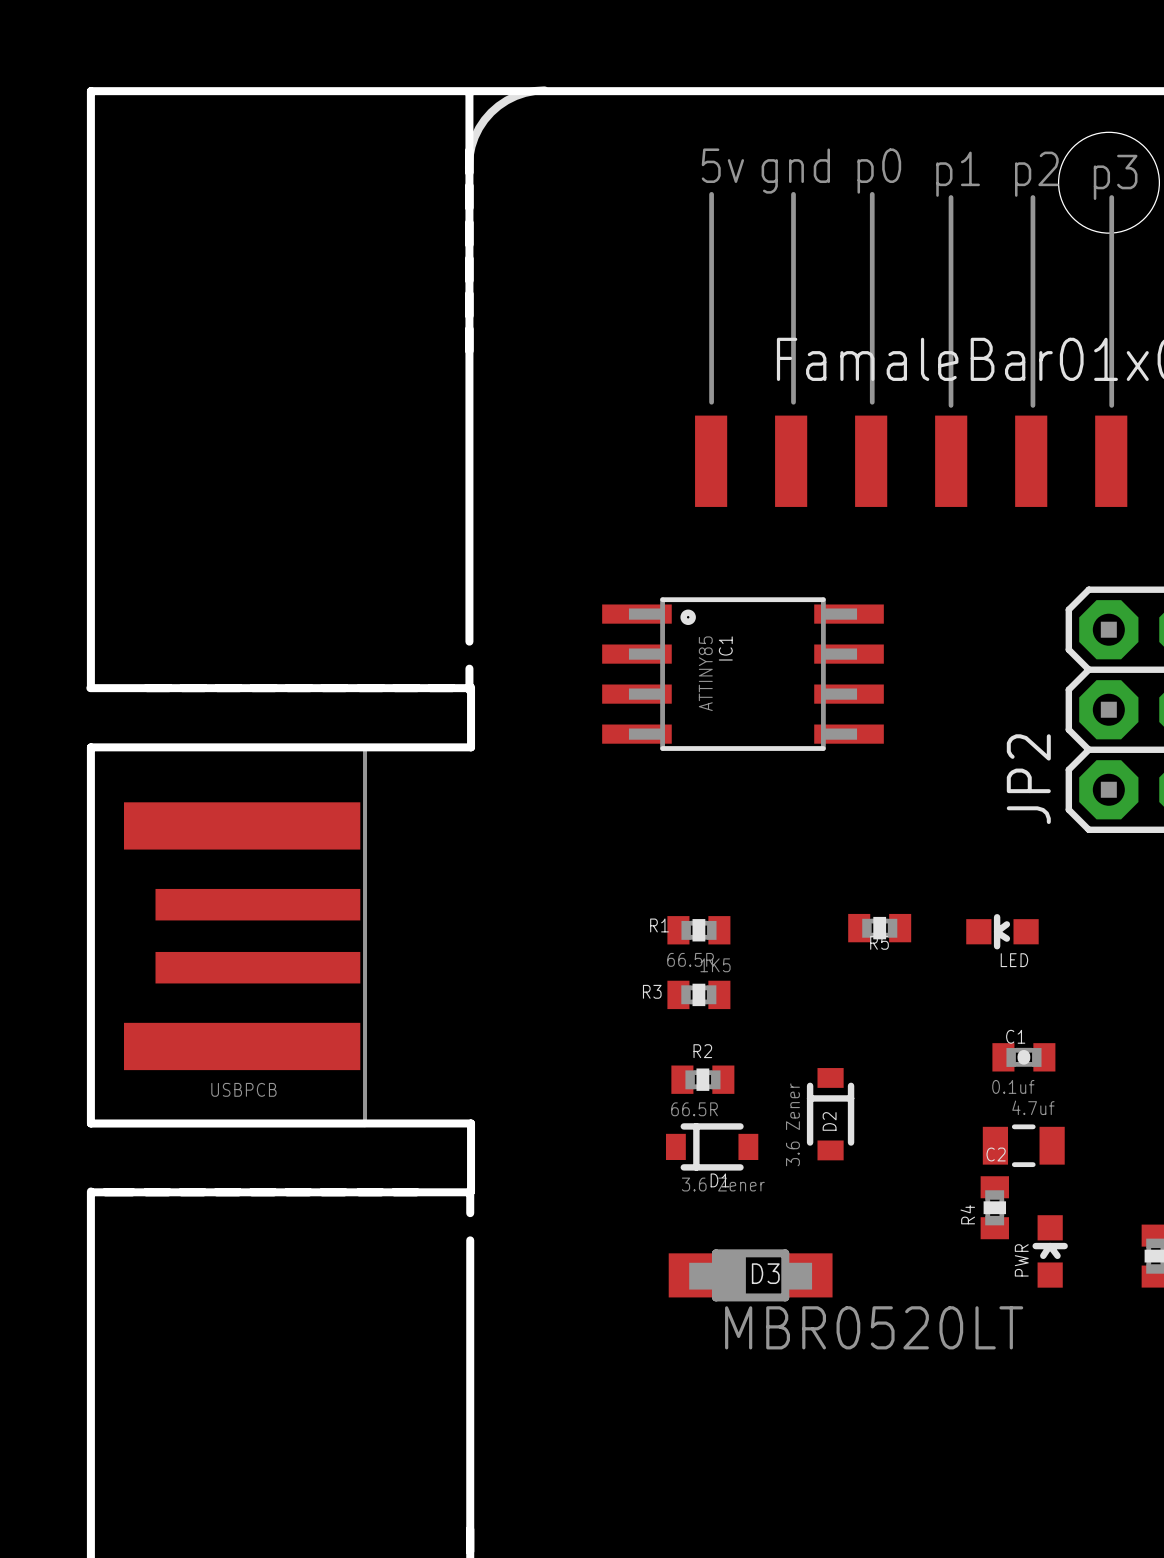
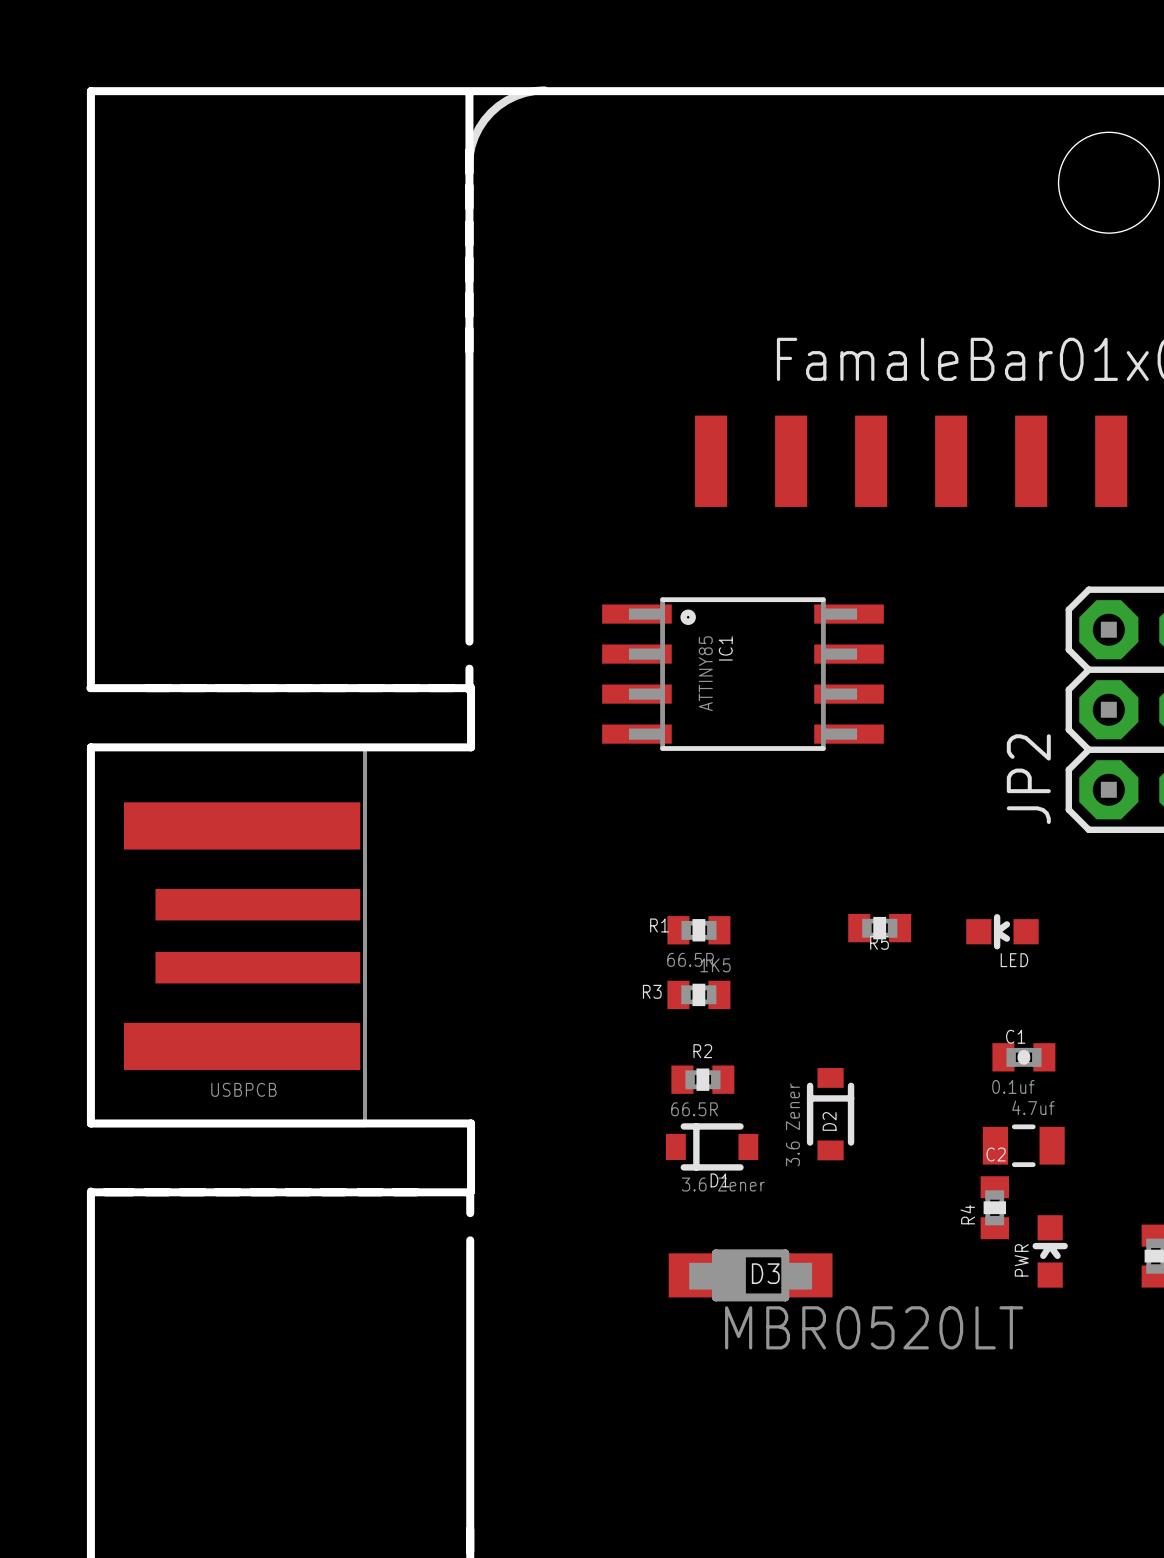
text: 5v (722, 165) -> none
text: gnd (795, 171) -> none
text: p0 (879, 171) -> none
text: p1 (958, 174) -> none
text: p2 (1036, 174) -> none
text: p3 (1115, 177) -> none
line: (711, 194) (711, 402) -> none
line: (793, 194) (793, 402) -> none
line: (872, 194) (872, 402) -> none
line: (951, 197) (951, 405) -> none
line: (1032, 197) (1032, 405) -> none
line: (1111, 197) (1111, 405) -> none

